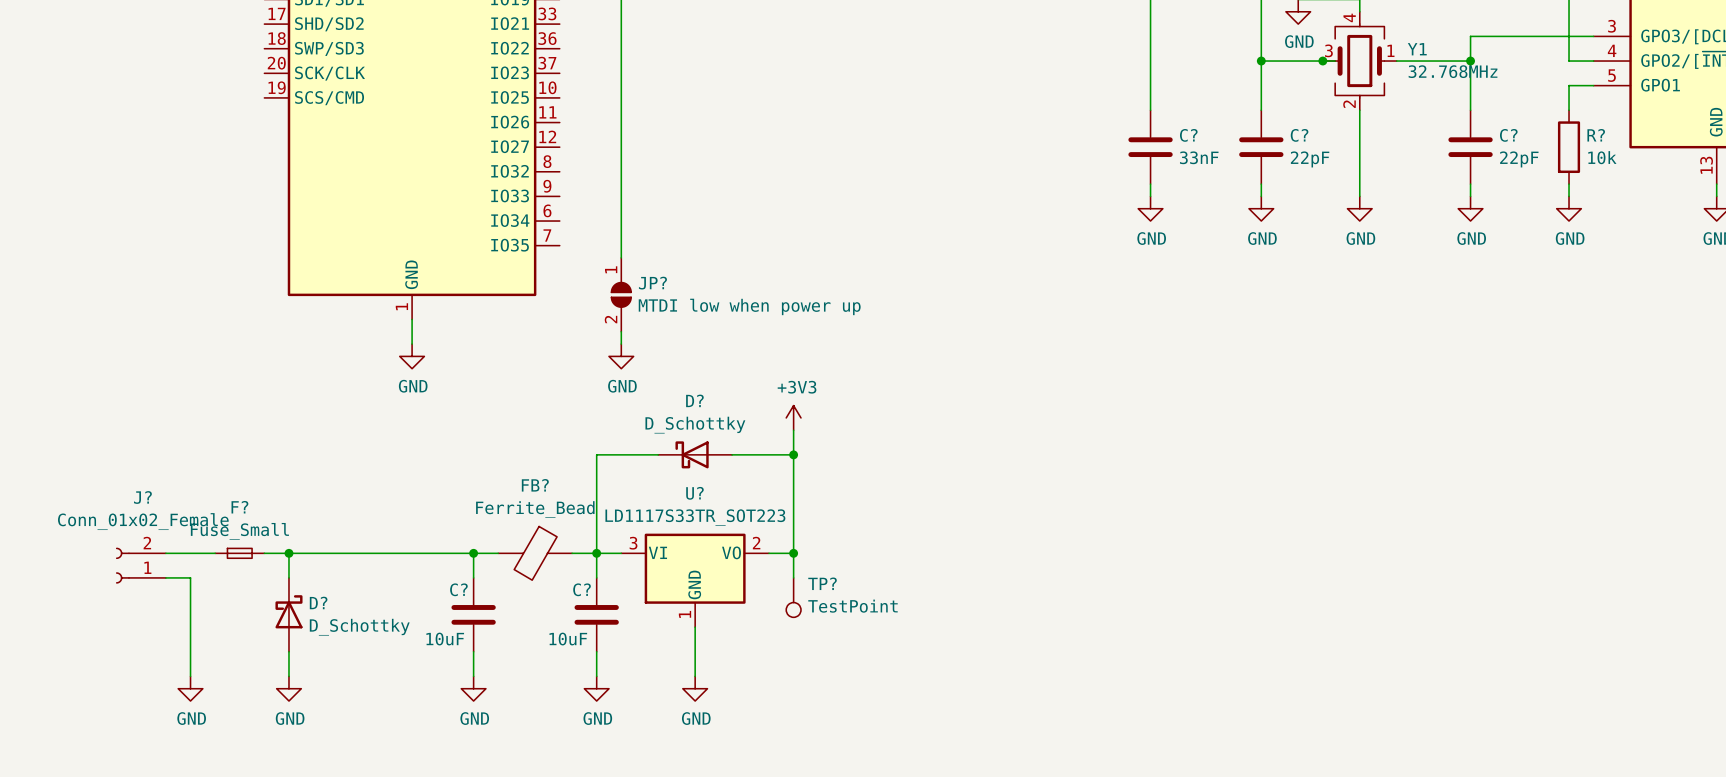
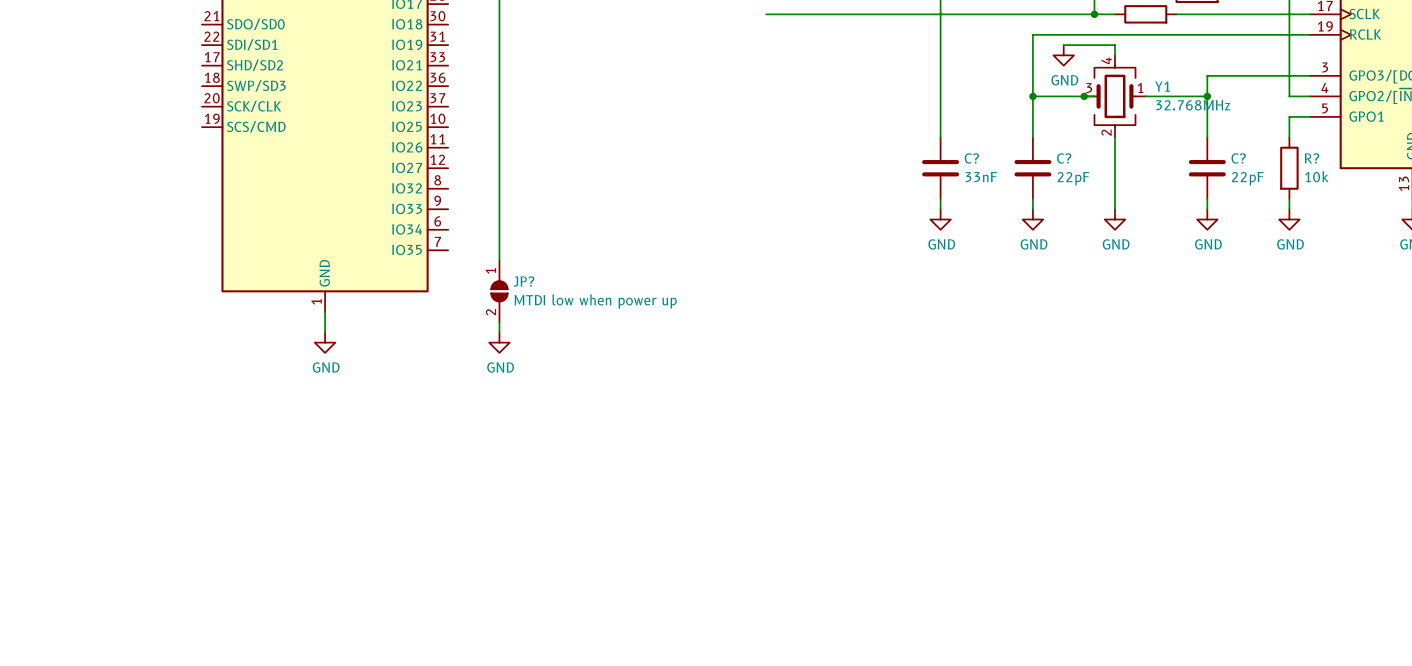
power symbol: +3V3 (793, 417) -> none
wire: (793, 430) (793, 577) -> none
wire: (658, 454) (596, 454) (596, 577) -> none
D?: D_Schottky (695, 454) -> none
wire: (732, 454) (793, 454) -> none
junction: (793, 454) -> none
wire: (165, 553) (215, 553) -> none
F?: Fuse_Small (239, 553) -> none
wire: (264, 553) (498, 553) -> none
wire: (288, 553) (288, 577) -> none
junction: (288, 553) -> none
wire: (473, 553) (473, 577) -> none
junction: (473, 553) -> none
FB?: Ferrite_Bead (535, 553) -> none
wire: (572, 553) (621, 553) -> none
junction: (596, 553) -> none
wire: (769, 553) (793, 553) -> none
junction: (793, 553) -> none
J?: Conn_01x02_Female (140, 565) -> none
wire: (165, 577) (190, 577) (190, 676) -> none
U?: LD1117S33TR_SOT223 (695, 580) -> none
TP?: TestPoint (793, 597) -> none
D?: D_Schottky (288, 614) -> none
C?: 10uF (473, 614) -> none
C?: 10uF (596, 614) -> none
wire: (695, 627) (695, 676) -> none
wire: (288, 651) (288, 676) -> none
wire: (473, 651) (473, 676) -> none
wire: (596, 651) (596, 676) -> none
power symbol: GND (190, 688) -> none
power symbol: GND (288, 688) -> none
power symbol: GND (473, 688) -> none
power symbol: GND (596, 688) -> none
power symbol: GND (695, 688) -> none

